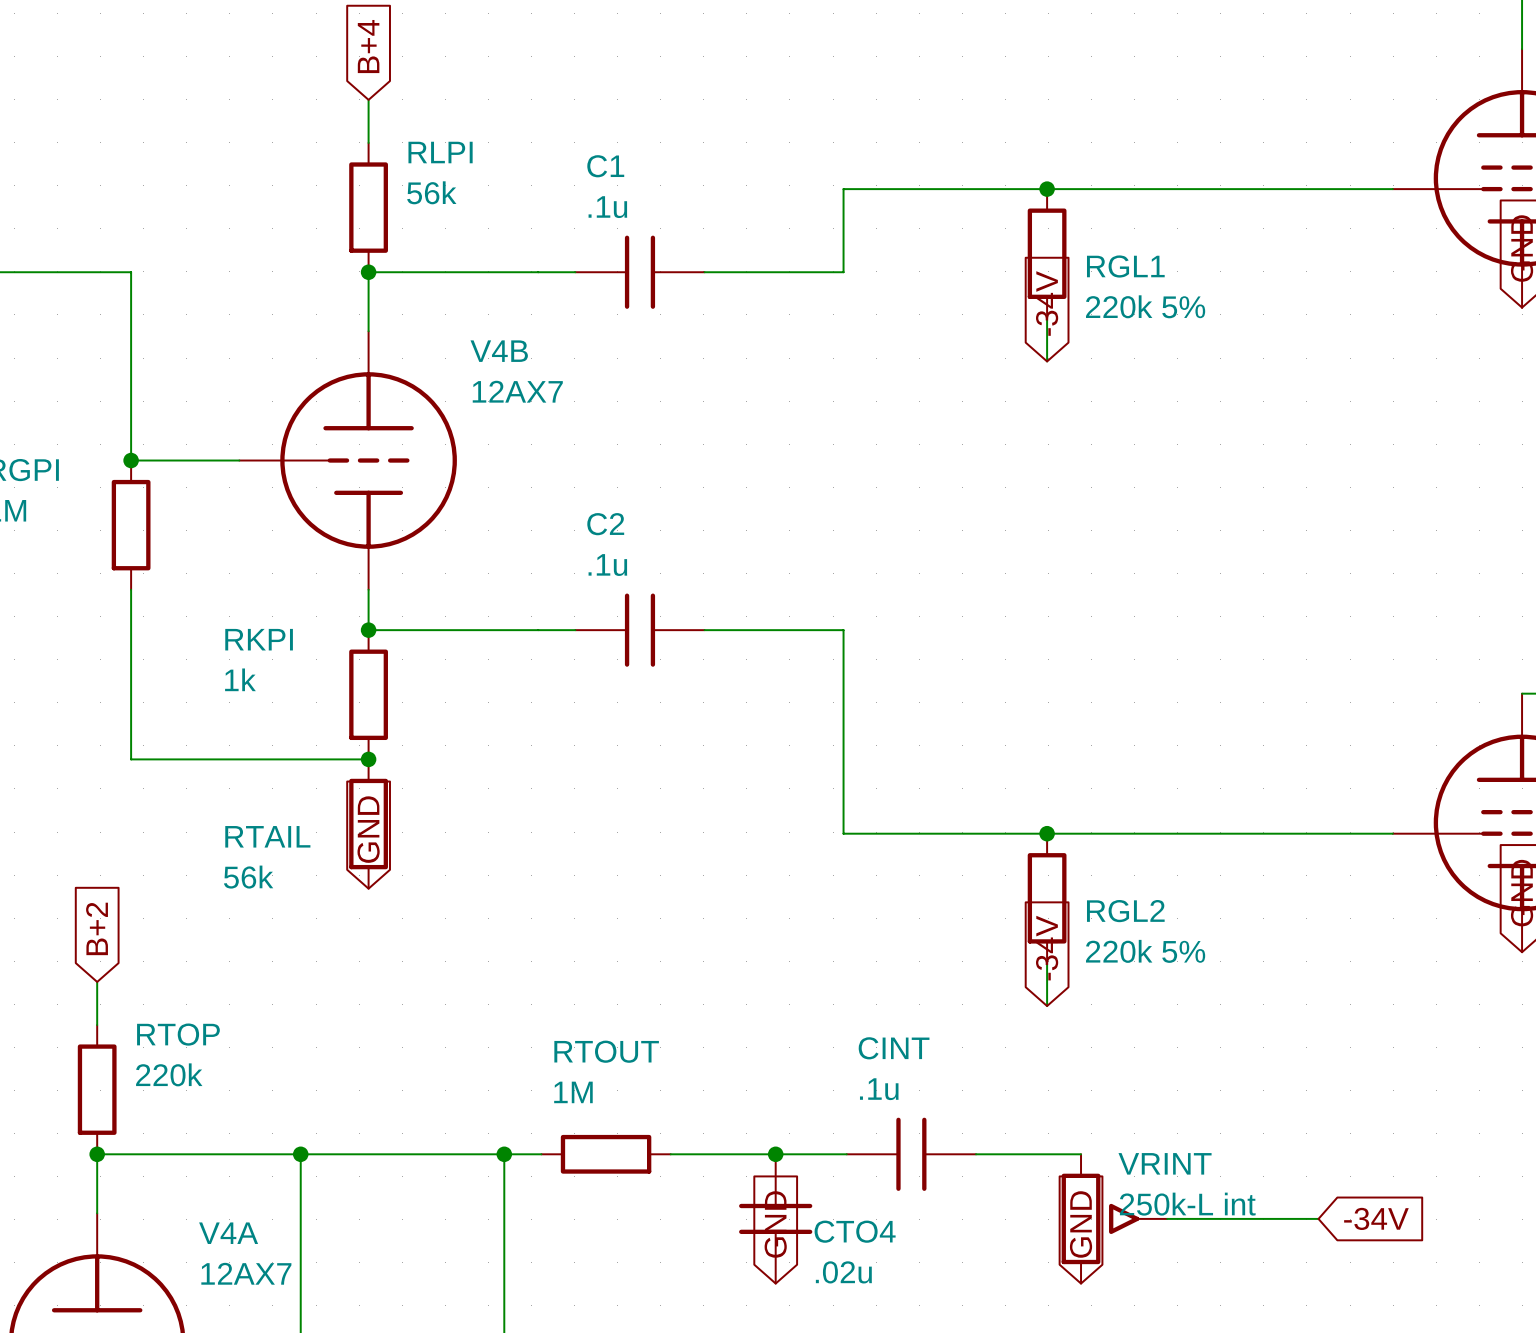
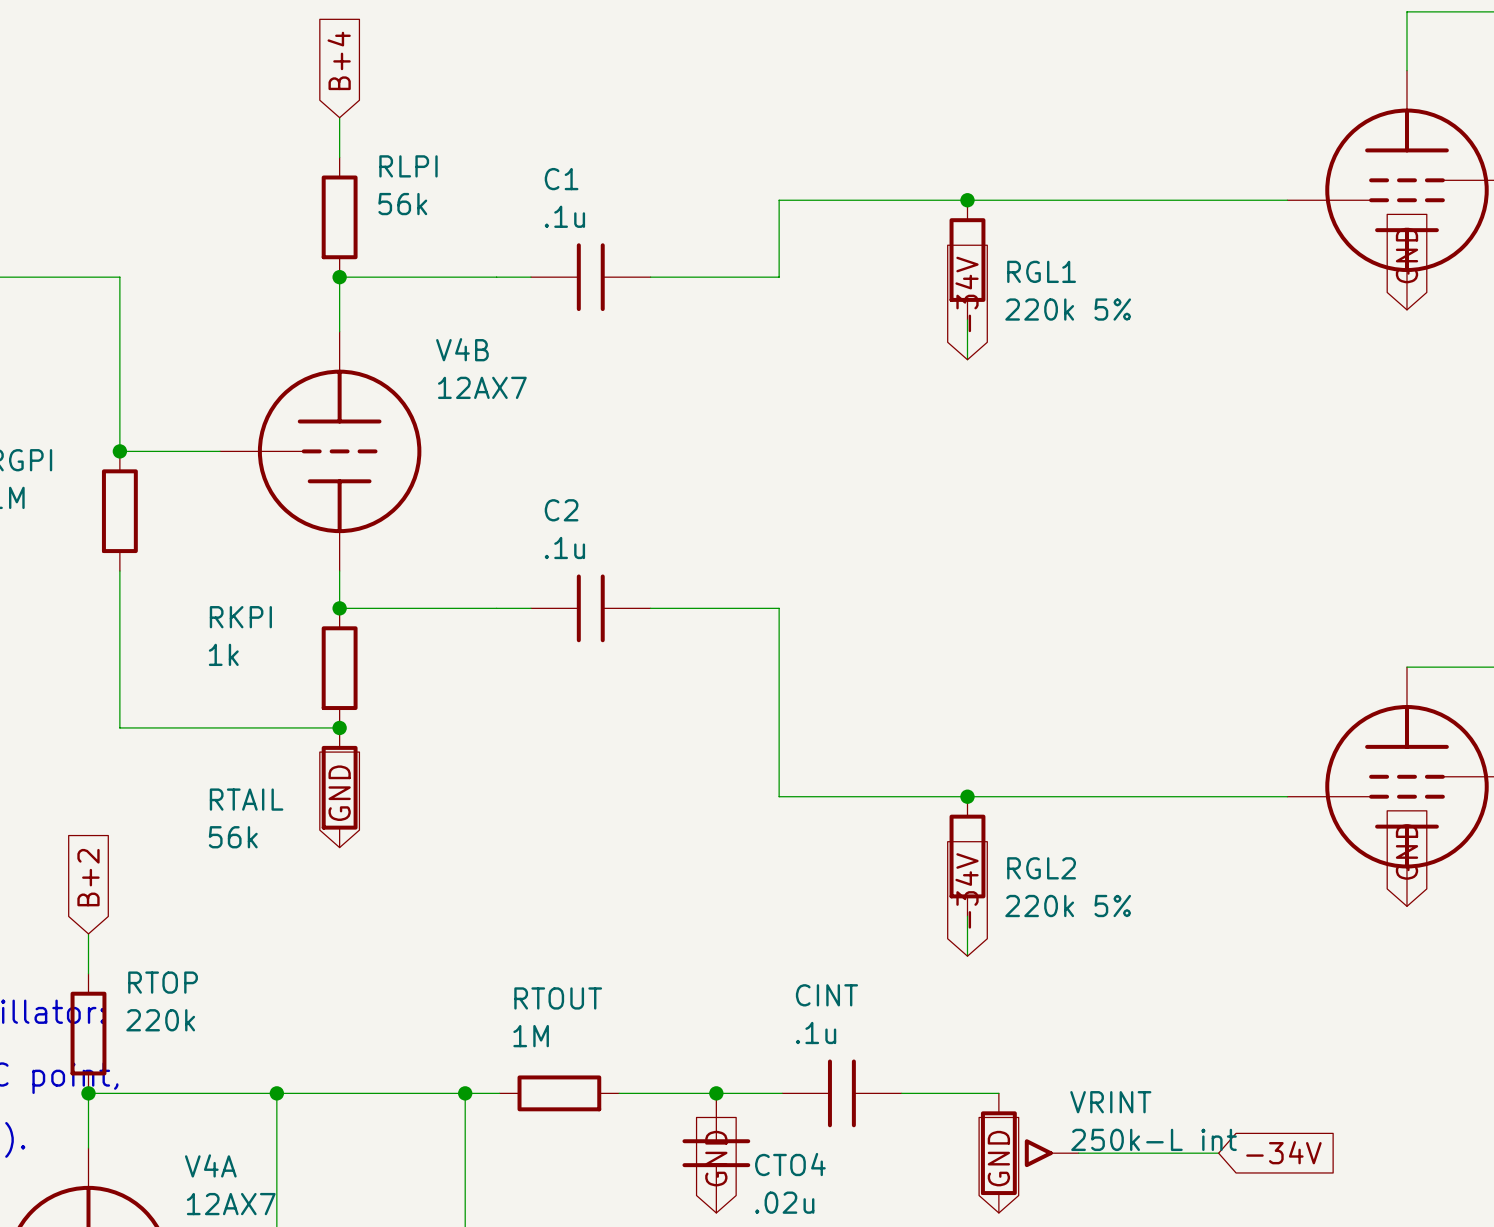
VRINT name position: VRINT (1165, 1163) -> VRINT (1110, 1102)
VRINT value position: 250k-L int (1187, 1204) -> 250k-L int (1154, 1139)

